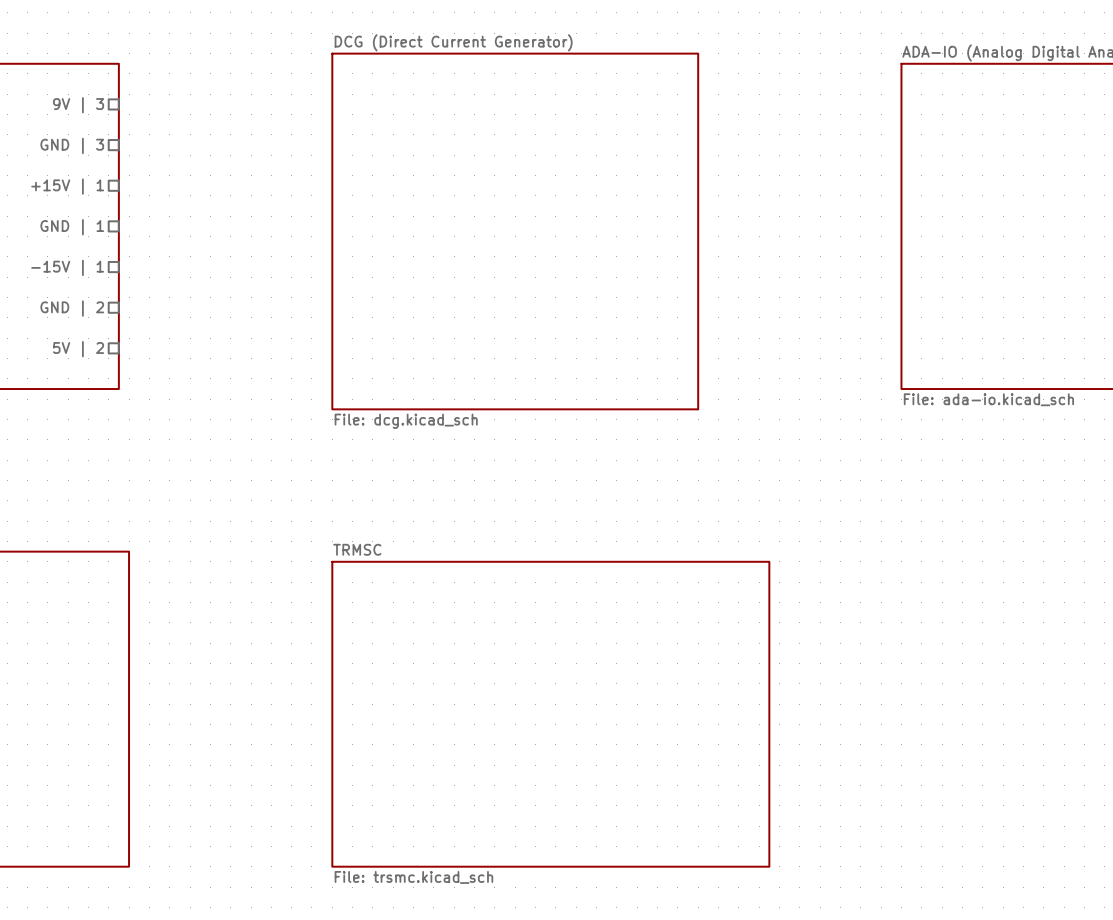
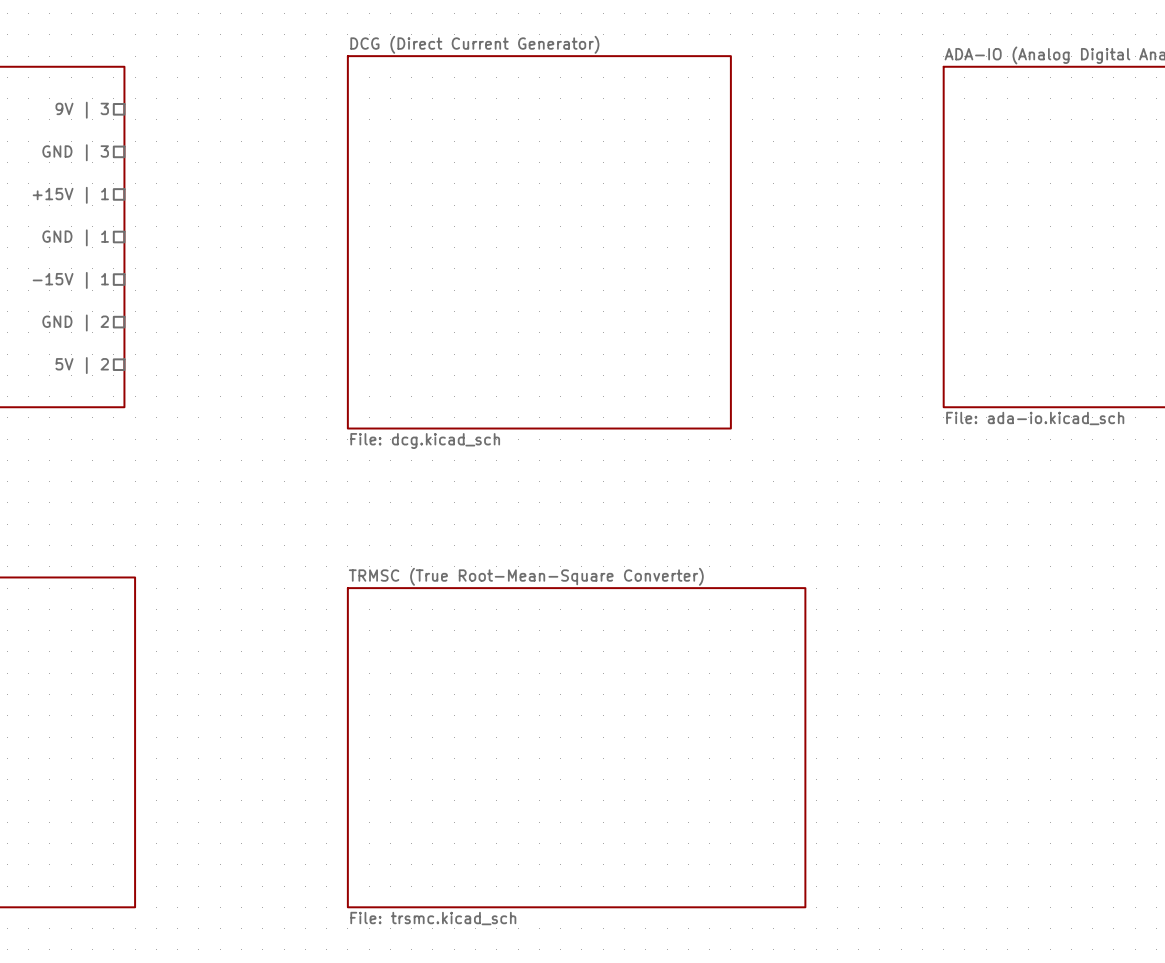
sheet TRMSC name: TRMSC (357, 549) -> TRMSC (True Root-Mean-Square Converter) (526, 576)

